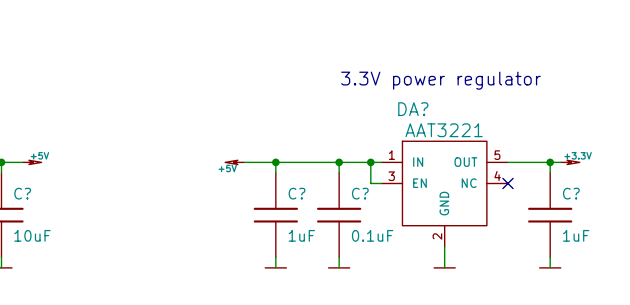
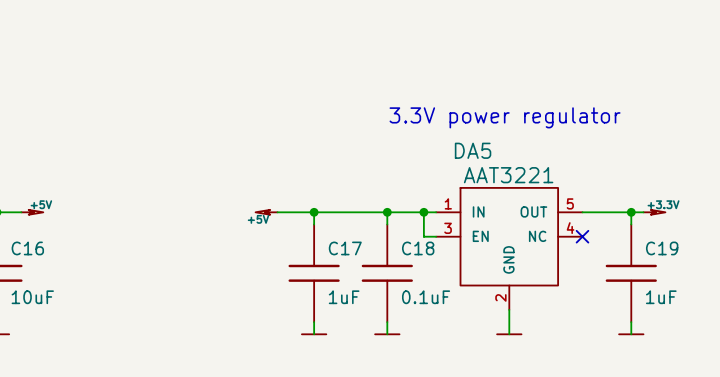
DA? name: DA? (413, 109) -> DA5 (473, 150)
C? name: C? (22, 193) -> C16 (27, 248)
C? name: C? (297, 193) -> C17 (345, 248)
C? name: C? (360, 193) -> C18 (418, 248)
C? name: C? (571, 193) -> C19 (662, 248)

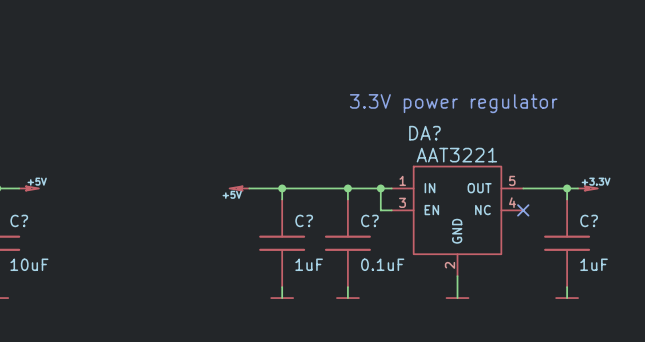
DA5 name: DA5 (473, 150) -> DA? (424, 133)
C16 name: C16 (27, 248) -> C? (19, 220)
C17 name: C17 (345, 248) -> C? (304, 220)
C18 name: C18 (418, 248) -> C? (369, 220)
C19 name: C19 (662, 248) -> C? (589, 220)

